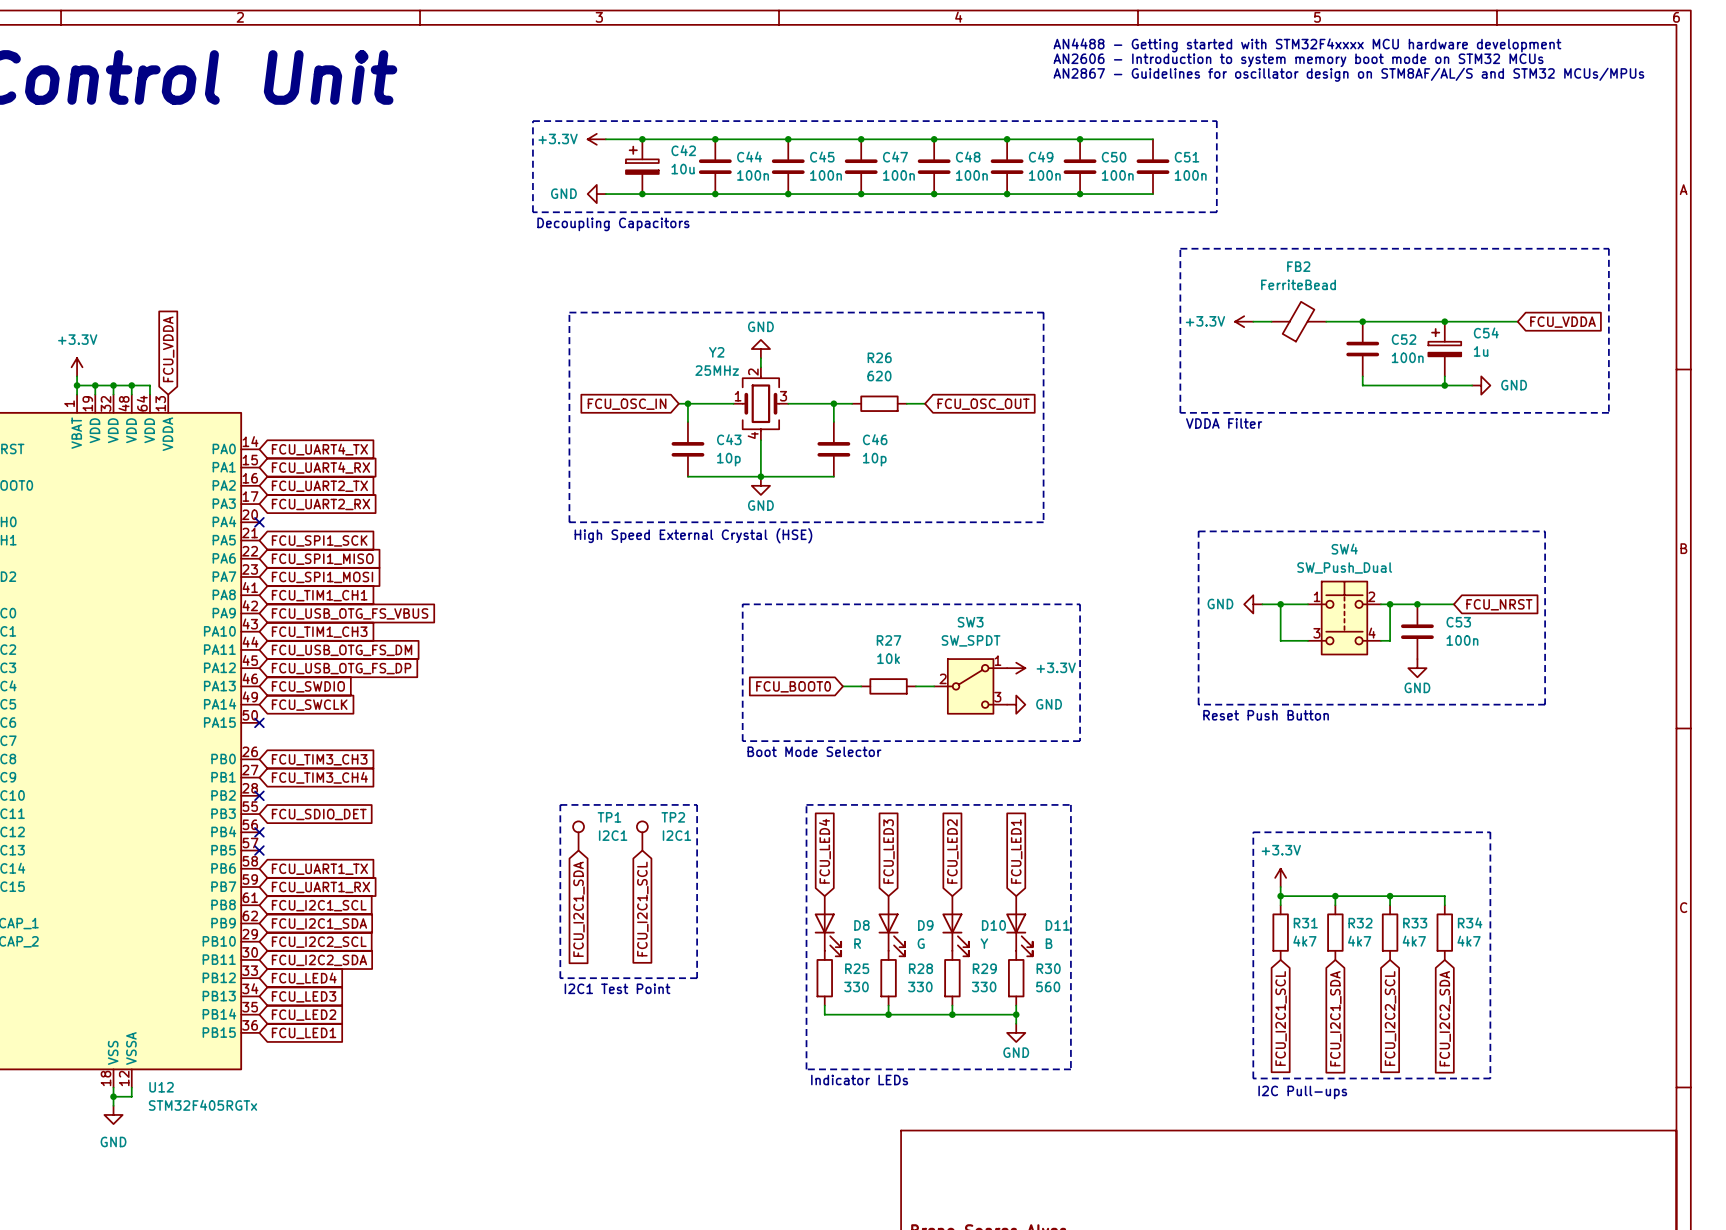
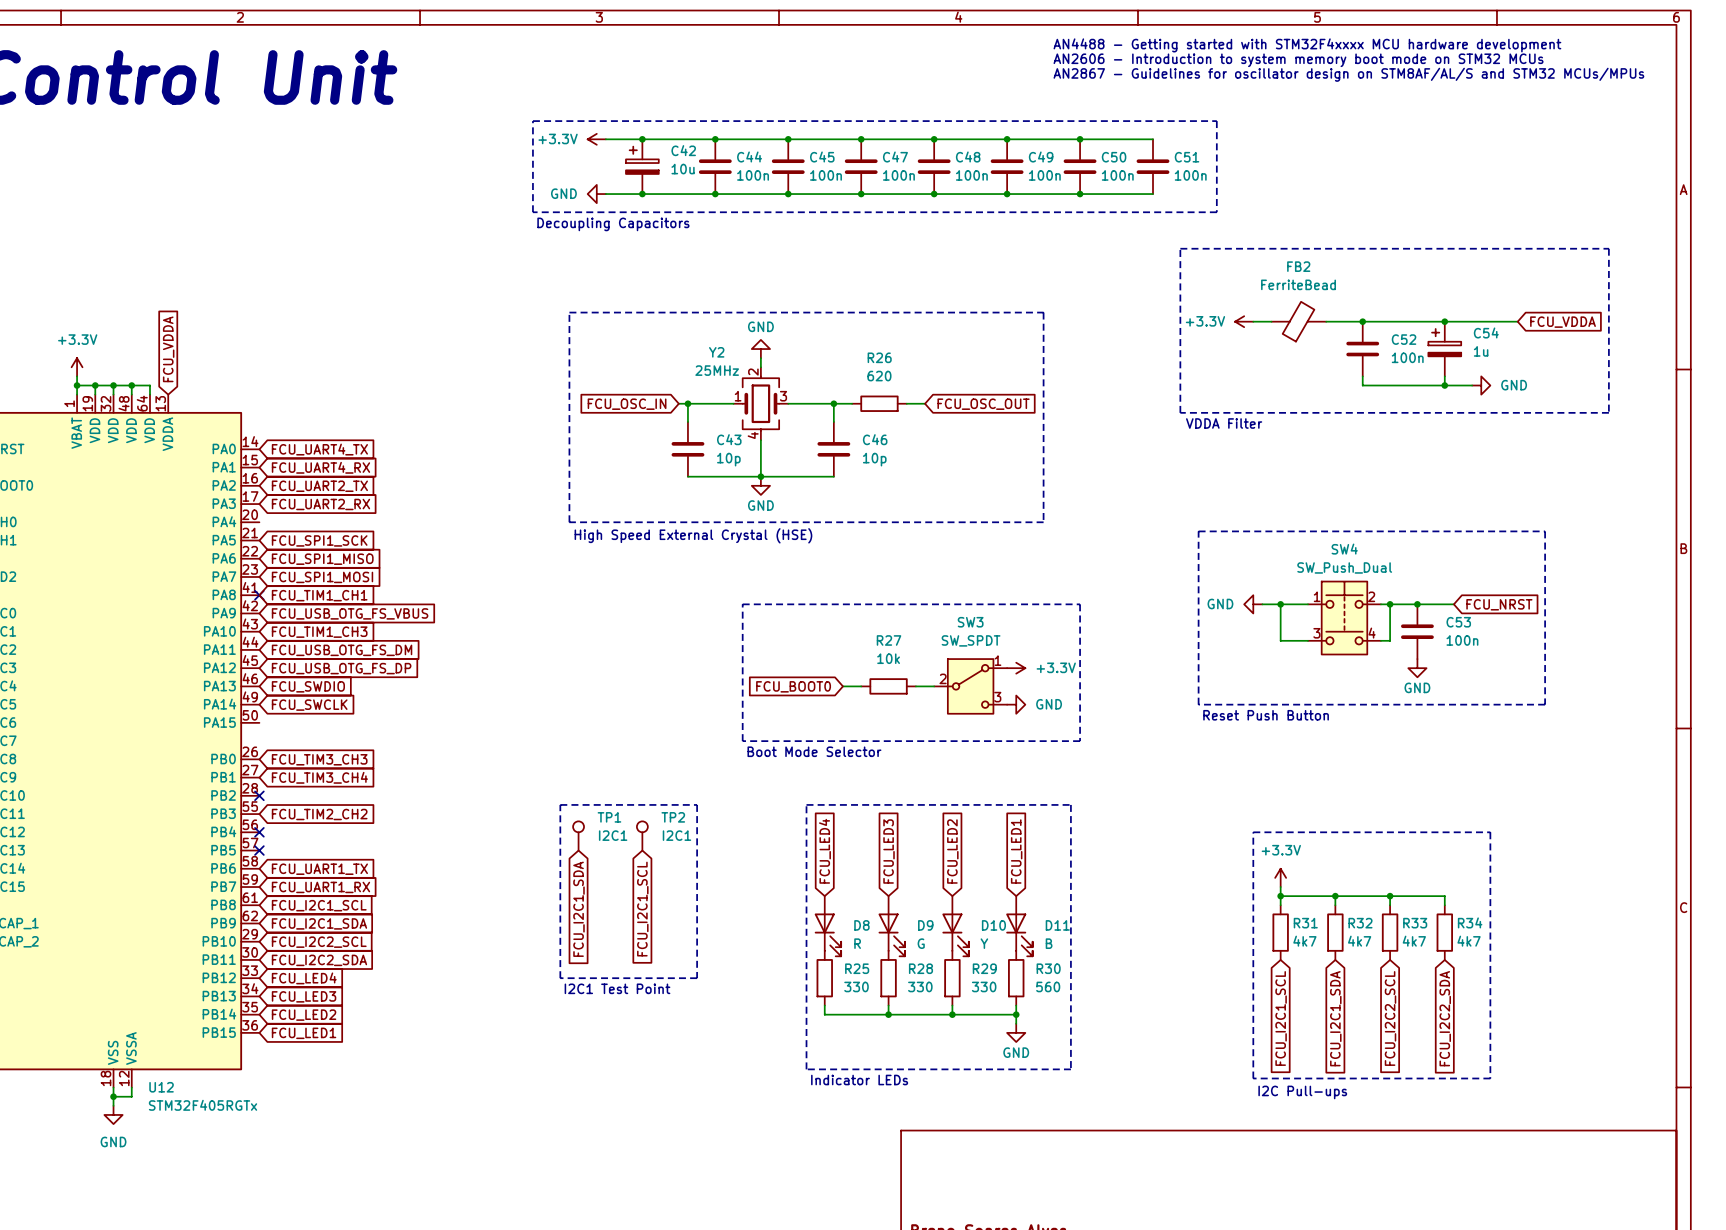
no-connect mark: (259, 522) -> none
no-connect mark: none -> (259, 595)
no-connect mark: (259, 722) -> none
global label: FCU_SDIO_DET (319, 814) -> FCU_TIM2_CH2 (319, 814)

